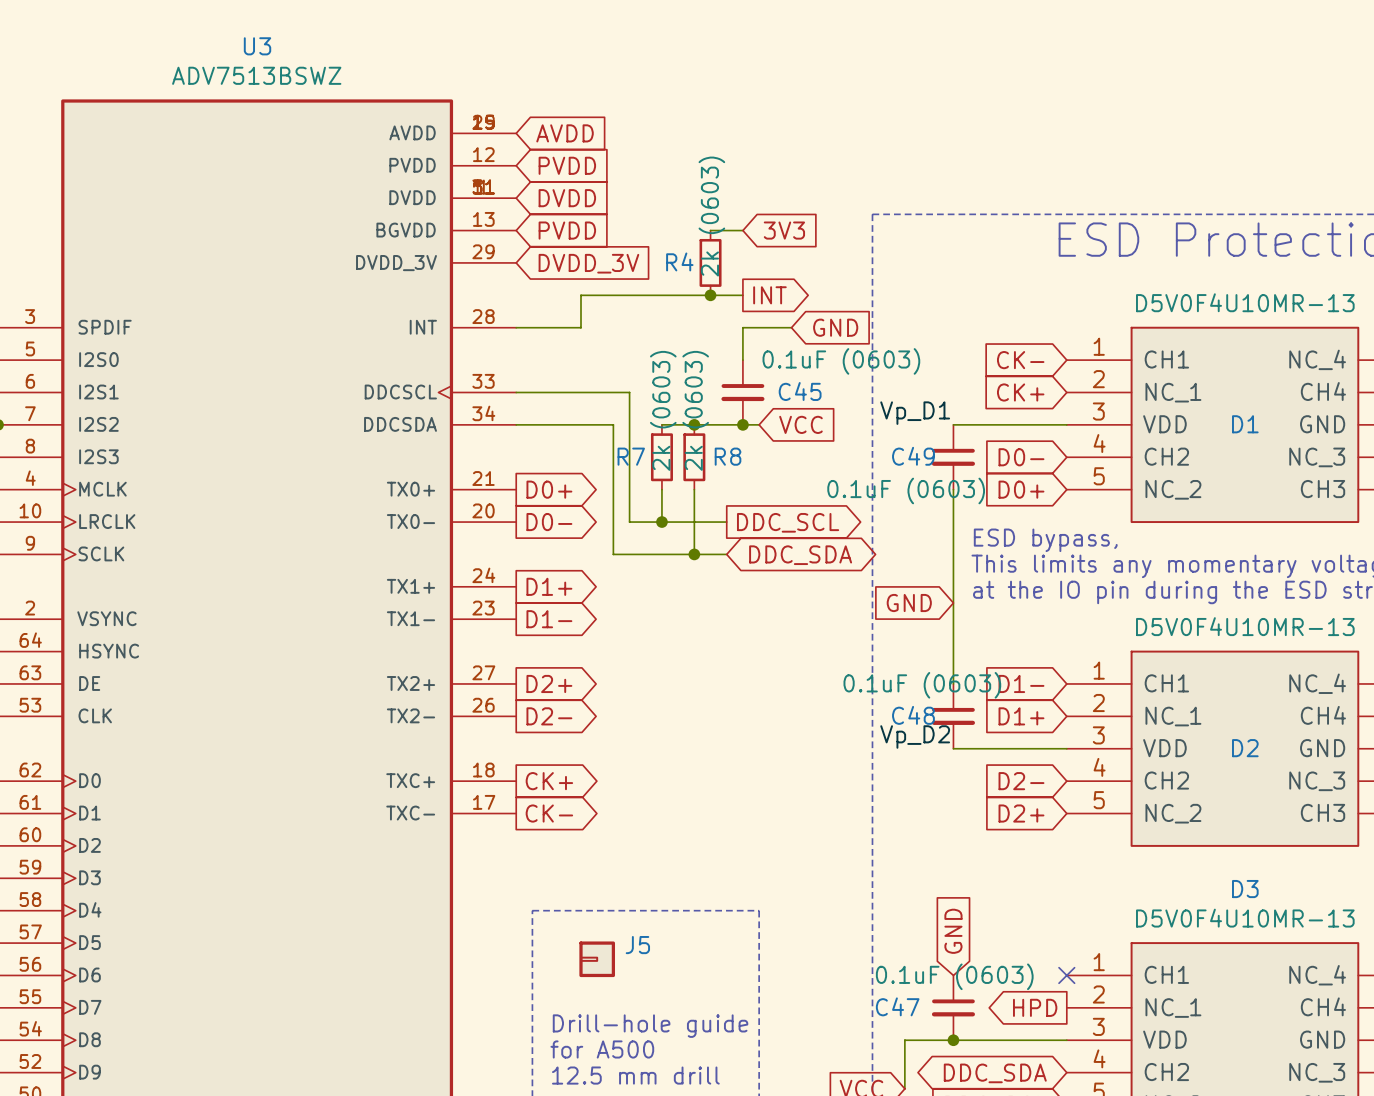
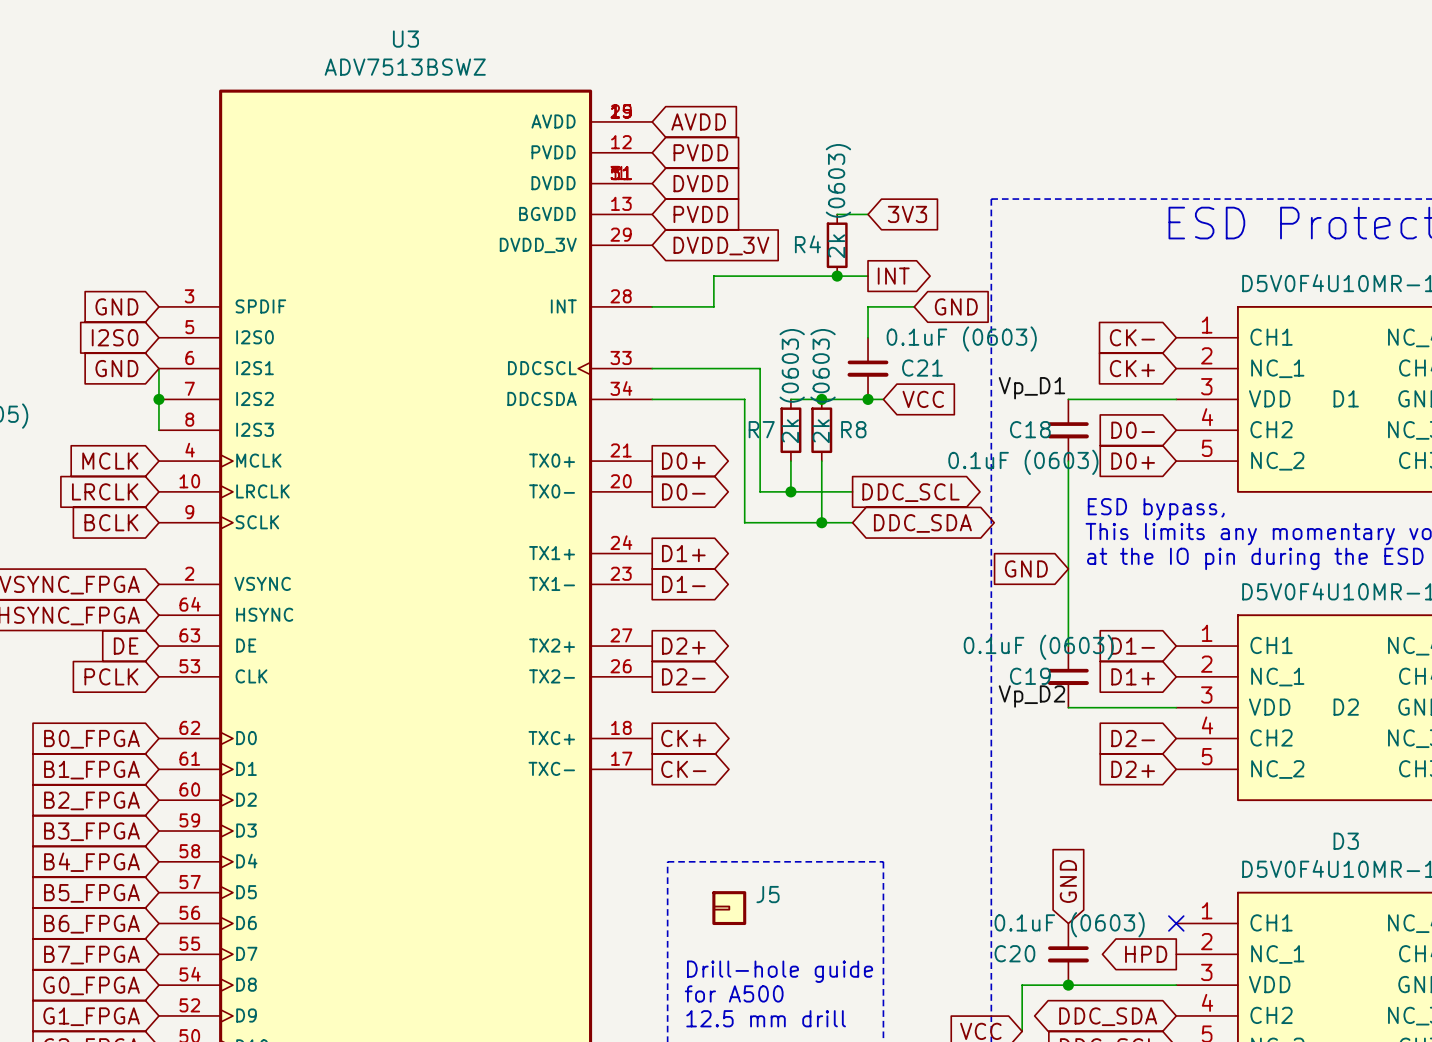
C45 name: C45 (800, 391) -> C21 (922, 368)
C49 name: C49 (913, 456) -> C18 (1030, 429)
C48 name: C48 (913, 715) -> C19 (1030, 676)
C47 name: C47 (897, 1006) -> C20 (1014, 953)

